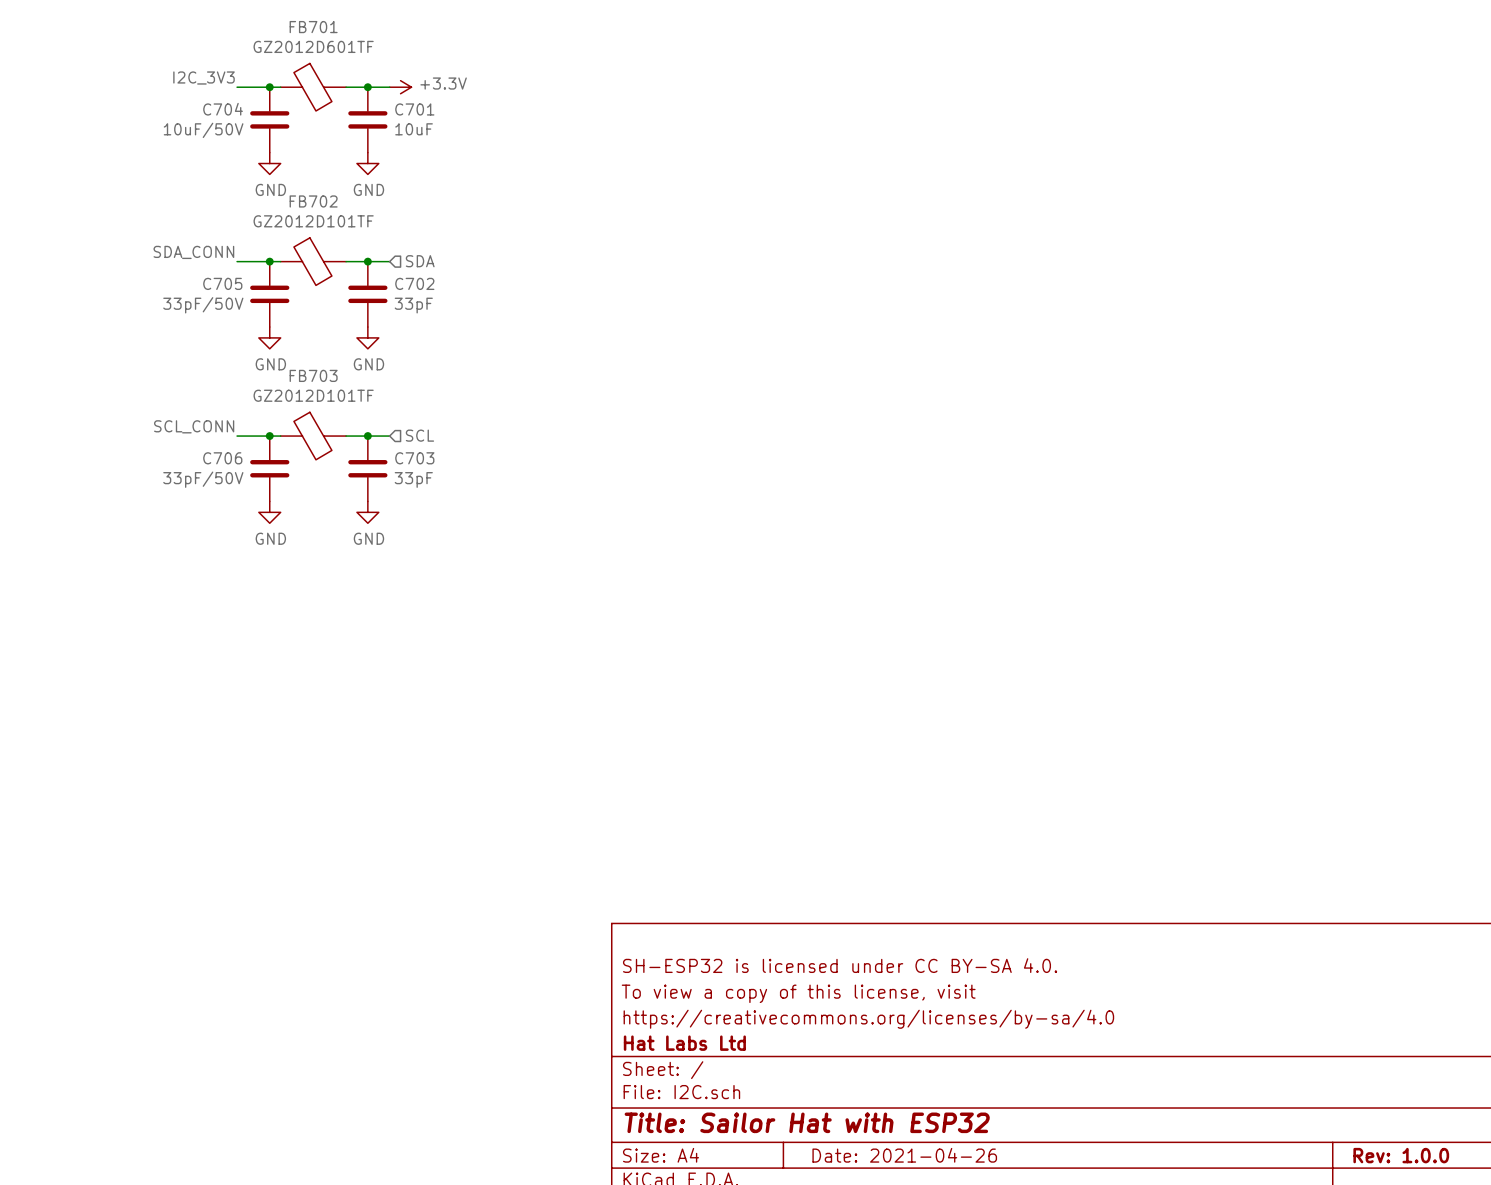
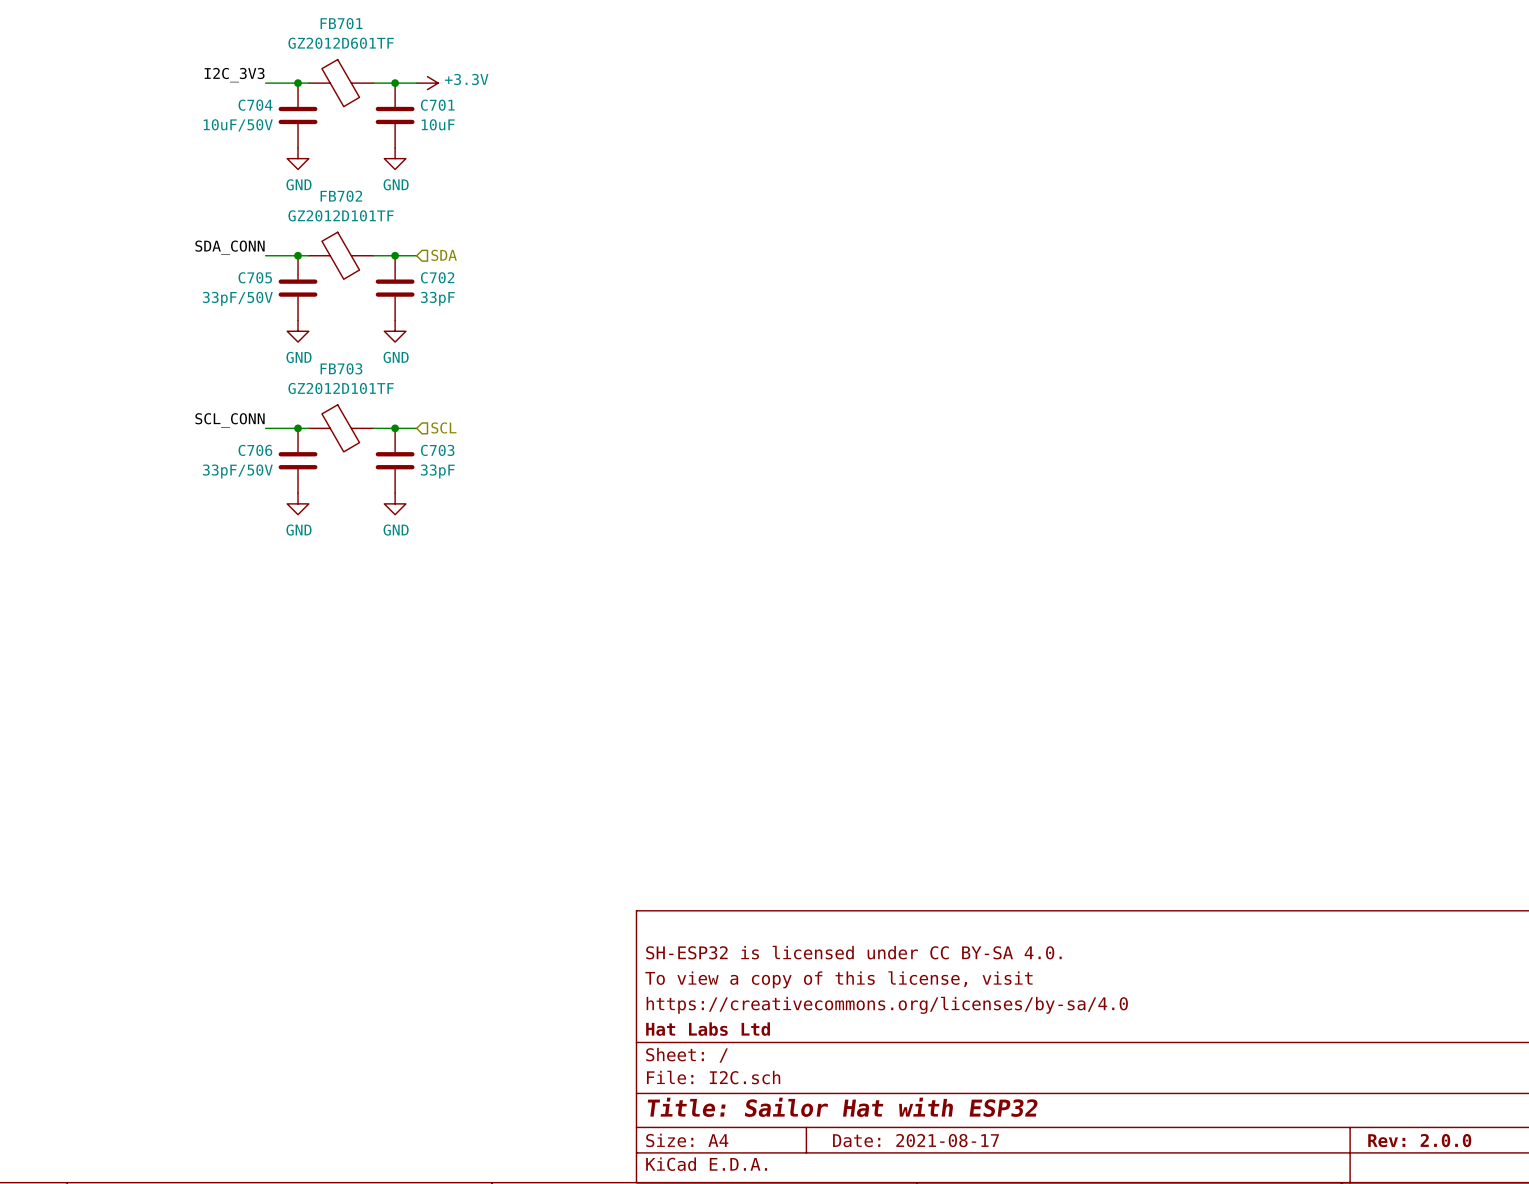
title block: Date: 2021-04-26 (904, 1155) -> Date: 2021-08-17 (915, 1140)
title block: Rev: 1.0.0 (1401, 1155) -> Rev: 2.0.0 (1419, 1140)

